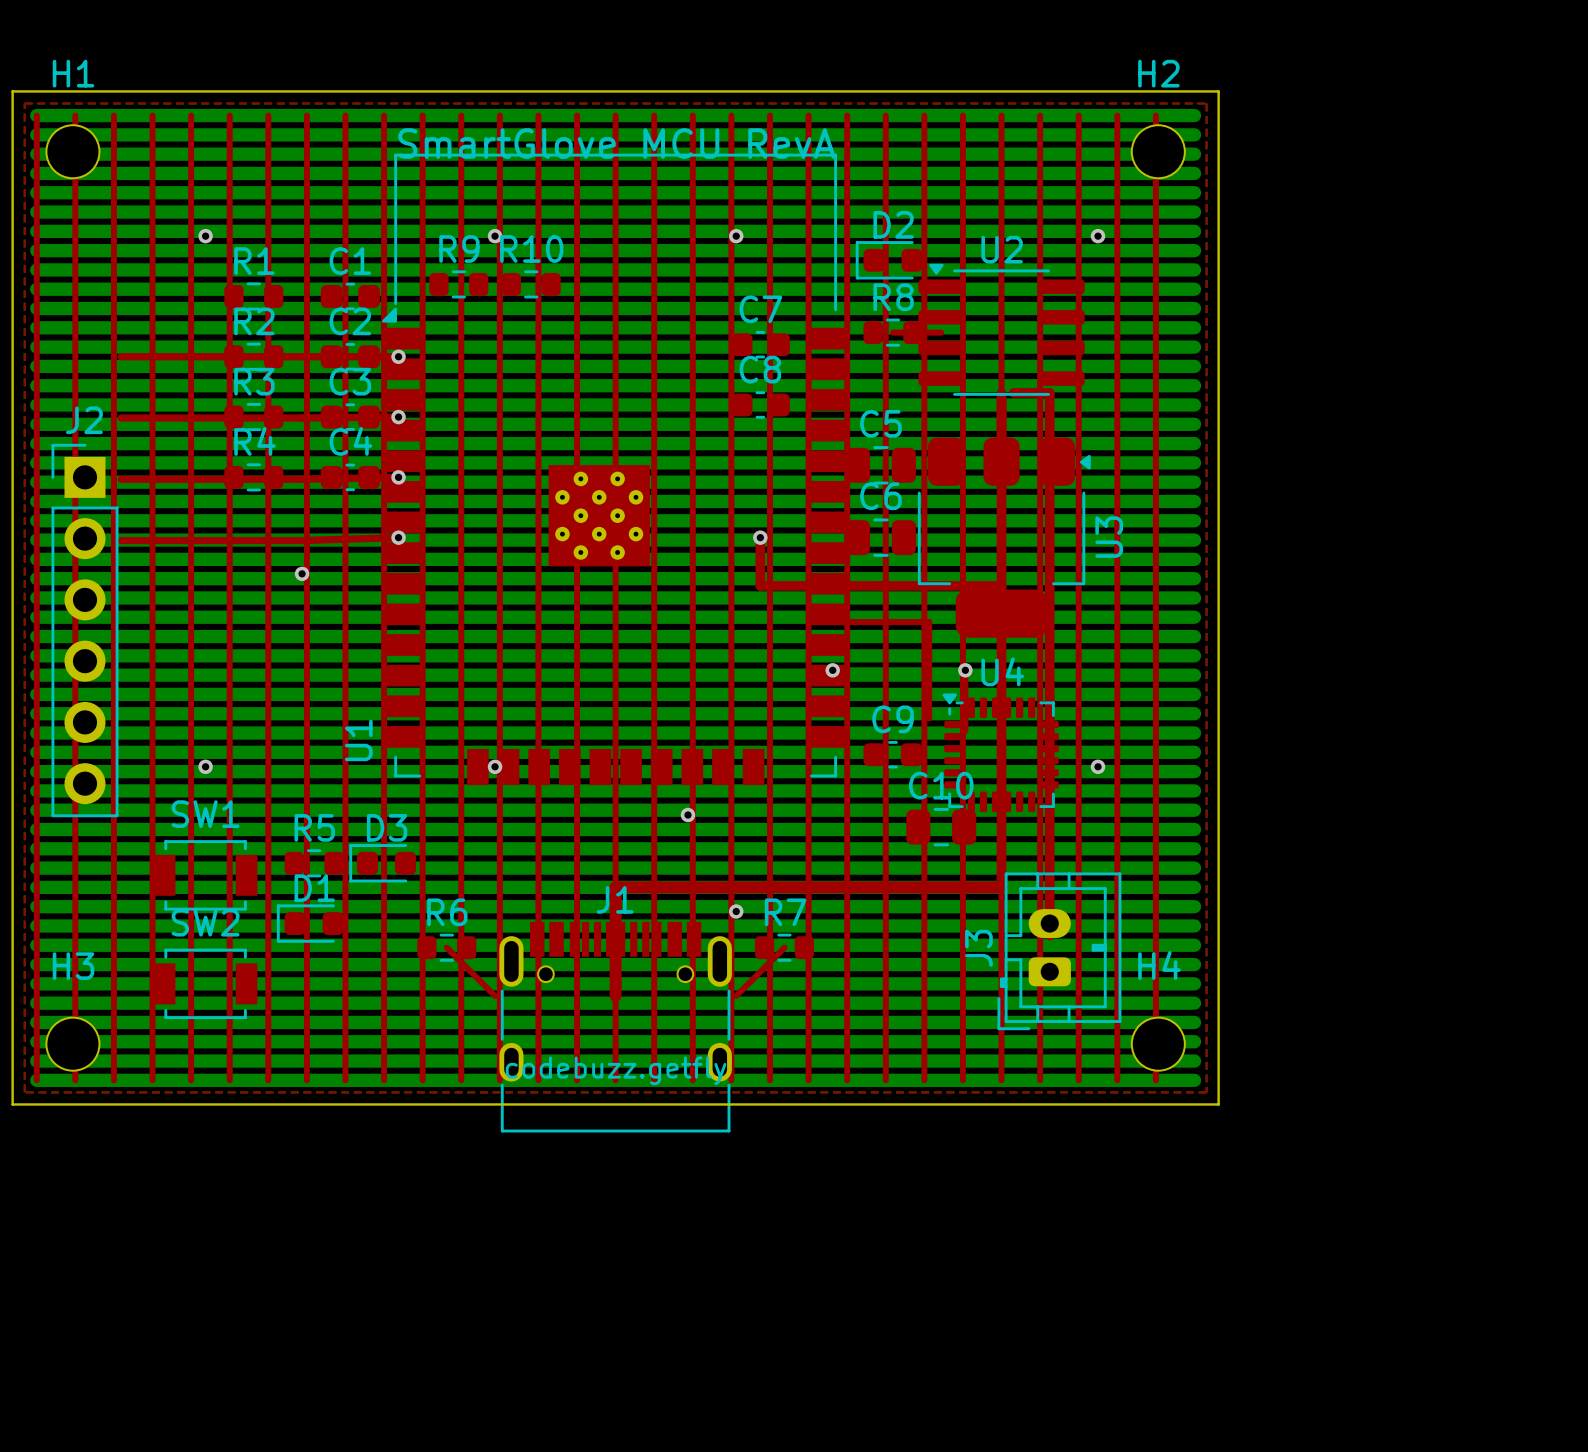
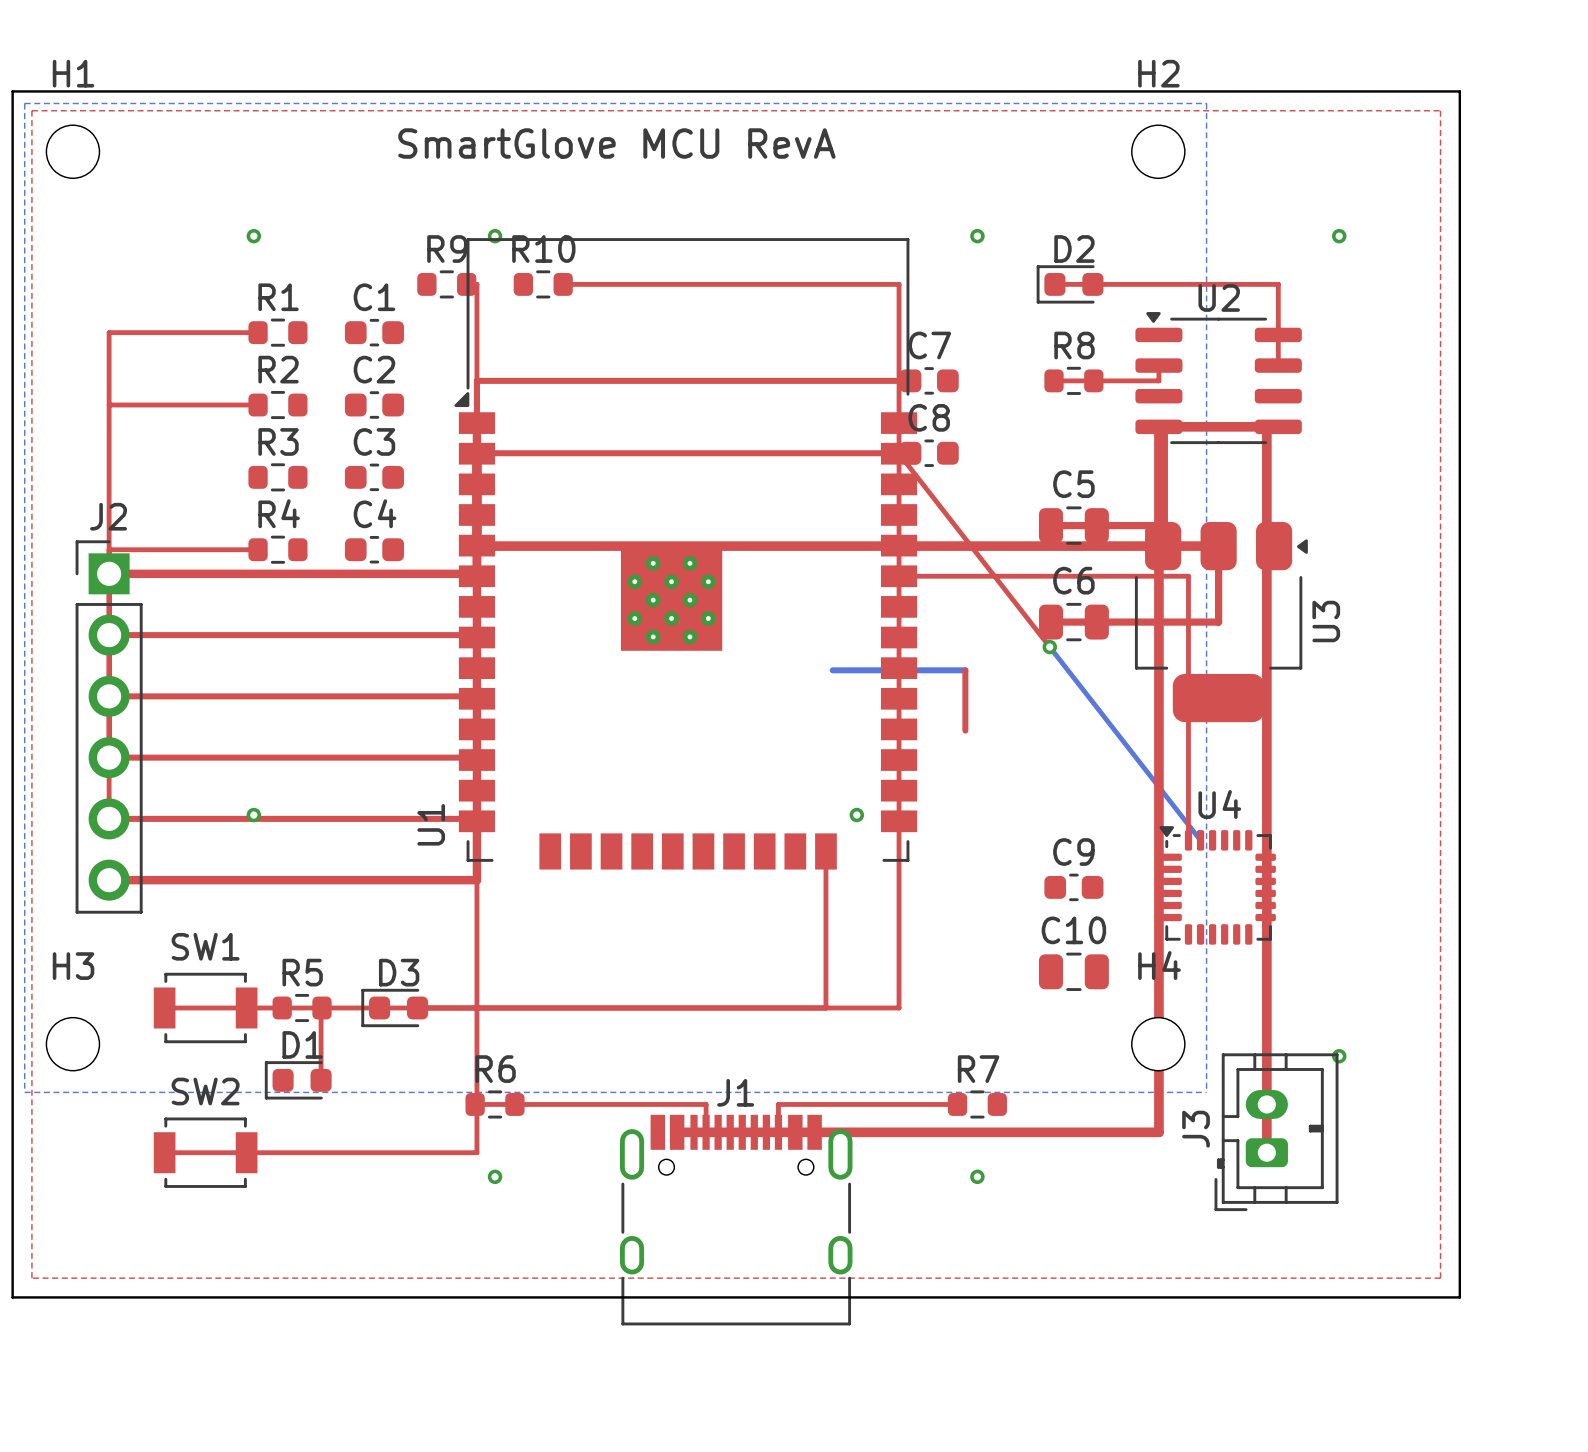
board edge: (1218, 91) (1218, 1104) (12, 1104) -> (1218, 91) (1459, 91) (1459, 1297) (12, 1297) (12, 1104)
top zone outline: (24, 103) (1206, 103) (1206, 1092) (24, 1092) (24, 103) -> (31, 110) (31, 1278) (1440, 1278) (1440, 110) (31, 110)
top track: (36, 115) (36, 1080) -> none
bottom track: (36, 115) (1194, 115) -> none
top track: (75, 115) (75, 1080) -> none
top track: (113, 115) (113, 1080) -> none
top track: (152, 115) (152, 1080) -> none
top track: (191, 115) (191, 1080) -> none
top track: (229, 115) (229, 1080) -> none
top track: (268, 115) (268, 1080) -> none
top track: (306, 115) (306, 1080) -> none
top track: (345, 115) (345, 1080) -> none
top track: (384, 115) (384, 1080) -> none
top track: (422, 115) (422, 1080) -> none
top track: (461, 115) (461, 1080) -> none
top track: (499, 115) (499, 1080) -> none
top track: (538, 115) (538, 1080) -> none
top track: (577, 115) (577, 1080) -> none
top track: (615, 115) (615, 1080) -> none
top track: (654, 115) (654, 1080) -> none
top track: (692, 115) (692, 1080) -> none
top track: (731, 115) (731, 1080) -> none
top track: (770, 115) (770, 1080) -> none
top track: (808, 115) (808, 1080) -> none
top track: (847, 115) (847, 1080) -> none
top track: (885, 115) (885, 1080) -> none
top track: (924, 115) (924, 1080) -> none
top track: (962, 115) (962, 1080) -> none
top track: (1001, 115) (1001, 1080) -> none
top track: (1040, 115) (1040, 1080) -> none
top track: (1078, 115) (1078, 1080) -> none
top track: (1117, 115) (1117, 1080) -> none
top track: (1155, 115) (1155, 1080) -> none
bottom track: (36, 134) (1194, 134) -> none
bottom track: (36, 154) (1194, 154) -> none
bottom track: (36, 173) (1194, 173) -> none
bottom track: (36, 192) (1194, 192) -> none
bottom track: (36, 212) (1194, 212) -> none
bottom track: (36, 231) (1194, 231) -> none
via position: (205, 236) -> (253, 236)
via: (736, 236) -> none
via: none -> (977, 236)
via: (1098, 236) -> none
via: none -> (1339, 236)
bottom track: (36, 250) (1194, 250) -> none
D2 position: (889, 260) -> (1070, 284)
bottom track: (36, 269) (1194, 269) -> none
R9 position: (458, 284) -> (446, 284)
top track: none -> (466, 284) (476, 284) (476, 1152) (164, 1152)
R10 position: (531, 284) -> (543, 284)
top track: none -> (563, 284) (899, 284) (899, 1007) (164, 1007)
top track: none -> (1054, 284) (1278, 284) (1278, 365)
bottom track: (36, 289) (1194, 289) -> none
R1 position: (253, 296) -> (277, 332)
C1 position: (350, 296) -> (374, 332)
bottom track: (36, 308) (1194, 308) -> none
bottom track: (36, 327) (1194, 327) -> none
U2 position: (1001, 329) -> (1218, 378)
top track: none -> (258, 332) (109, 332) (109, 818) (476, 818) (476, 514)
top track: (893, 332) (941, 332) -> none
R8 position: (893, 332) -> (1073, 380)
C7 position: (760, 344) -> (929, 380)
bottom track: (36, 347) (1194, 347) -> none
top track: (121, 356) (398, 356) -> none
R2 position: (253, 356) -> (277, 405)
C2 position: (350, 356) -> (374, 405)
via: (398, 356) -> none
top track: none -> (1158, 365) (1158, 380) (1054, 380)
bottom track: (36, 366) (1194, 366) -> none
top track: none -> (910, 380) (476, 380) (476, 546) (1218, 546) (1218, 622) (1050, 622)
bottom track: (36, 385) (1194, 385) -> none
top track: (1001, 392) (1001, 887) (615, 887) (615, 995) -> none
top track: (1013, 392) (1049, 392) (1049, 935) -> none
bottom track: (36, 405) (1194, 405) -> none
top track: none -> (109, 405) (258, 405)
C8 position: (760, 405) -> (929, 453)
R3 position: (253, 417) -> (277, 477)
C3 position: (350, 417) -> (374, 477)
top track: (398, 417) (121, 418) -> none
via: (398, 417) -> none
top track: none -> (476, 423) (476, 880) (109, 880)
bottom track: (36, 424) (1194, 424) -> none
top track: none -> (1158, 426) (1158, 1132) (677, 1132)
top track: none -> (1266, 426) (1266, 1152)
top track: none -> (1278, 426) (1163, 426) (1163, 546) (1163, 525) (1050, 525)
bottom track: (36, 443) (1194, 443) -> none
top track: none -> (476, 453) (910, 453)
top track: none -> (899, 453) (1049, 647)
bottom track: (36, 462) (1194, 462) -> none
C5 position: (880, 465) -> (1073, 525)
U1 position: (613, 469) -> (685, 553)
R4 position: (253, 477) -> (277, 549)
C4 position: (350, 477) -> (374, 549)
top track: (398, 477) (121, 479) -> none
via: (398, 477) -> none
bottom track: (36, 482) (1194, 482) -> none
bottom track: (36, 501) (1194, 501) -> none
bottom track: (36, 520) (1194, 520) -> none
top track: (398, 537) (302, 540) (121, 540) -> none
via: (398, 537) -> none
top track: (760, 537) (760, 585) (1001, 585) -> none
via: (760, 537) -> none
C6 position: (880, 537) -> (1073, 622)
U3 position: (1004, 537) -> (1221, 622)
bottom track: (36, 540) (1194, 540) -> none
top track: none -> (109, 549) (258, 549)
bottom track: (36, 559) (1194, 559) -> none
top track: none -> (109, 573) (476, 573)
via: (302, 573) -> none
top track: none -> (899, 576) (1188, 576) (1188, 840)
bottom track: (36, 578) (1194, 578) -> none
bottom track: (36, 597) (1194, 597) -> none
bottom track: (36, 617) (1194, 617) -> none
top track: (832, 622) (929, 622) (929, 718) -> none
J2 position: (85, 630) -> (109, 727)
top track: none -> (109, 635) (476, 635)
bottom track: (36, 636) (1194, 636) -> none
bottom track: none -> (1049, 647) (1200, 840)
via: none -> (1049, 647)
bottom track: (36, 655) (1194, 655) -> none
via: (832, 670) -> none
via: (965, 670) -> none
bottom track: (36, 675) (1194, 675) -> none
bottom track: (36, 694) (1194, 694) -> none
top track: none -> (109, 696) (476, 696)
bottom track: (36, 713) (1194, 713) -> none
bottom track: (36, 733) (1194, 733) -> none
bottom track: (36, 752) (1194, 752) -> none
U4 position: (1000, 752) -> (1217, 885)
C9 position: (893, 754) -> (1073, 887)
top track: none -> (109, 757) (476, 757)
via position: (205, 766) -> (253, 815)
via: (495, 766) -> none
via: (1098, 766) -> none
bottom track: (36, 771) (1194, 771) -> none
bottom track: (36, 790) (1194, 790) -> none
bottom track: (36, 810) (1194, 810) -> none
via: (687, 815) -> none
via: none -> (856, 815)
C10 position: (941, 827) -> (1073, 971)
bottom track: (36, 829) (1194, 829) -> none
bottom track: (36, 848) (1194, 848) -> none
top track: none -> (825, 851) (825, 1007)
R5 position: (314, 863) -> (302, 1007)
D3 position: (382, 863) -> (394, 1007)
bottom track: (36, 868) (1194, 868) -> none
SW1 position: (205, 875) -> (205, 1007)
bottom track: (36, 887) (1194, 887) -> none
bottom track: (36, 906) (1194, 906) -> none
via: (736, 911) -> none
D1 position: (310, 923) -> (298, 1080)
bottom track: (36, 925) (1194, 925) -> none
bottom track: (36, 945) (1194, 945) -> none
top track: (446, 947) (495, 995) -> none
R6 position: (446, 947) -> (495, 1104)
top track: (784, 947) (736, 995) -> none
R7 position: (784, 947) -> (977, 1104)
J3 position: (1059, 951) -> (1276, 1132)
bottom track: (36, 964) (1194, 964) -> none
bottom track: (36, 983) (1194, 983) -> none
SW2 position: (205, 983) -> (205, 1152)
bottom track: (36, 1003) (1194, 1003) -> none
top track: none -> (321, 1007) (321, 1080)
bottom track: (36, 1022) (1194, 1022) -> none
J1 position: (615, 1027) -> (736, 1220)
bottom track: (36, 1041) (1194, 1041) -> none
via: none -> (1339, 1056)
bottom track: (36, 1061) (1194, 1061) -> none
text: codebuzz.getfly (616, 1070) -> none
bottom track: (36, 1080) (1194, 1080) -> none
top track: none -> (475, 1104) (706, 1104) (706, 1132)
top track: none -> (957, 1104) (778, 1104) (778, 1132)
via: none -> (495, 1176)
via: none -> (977, 1176)

